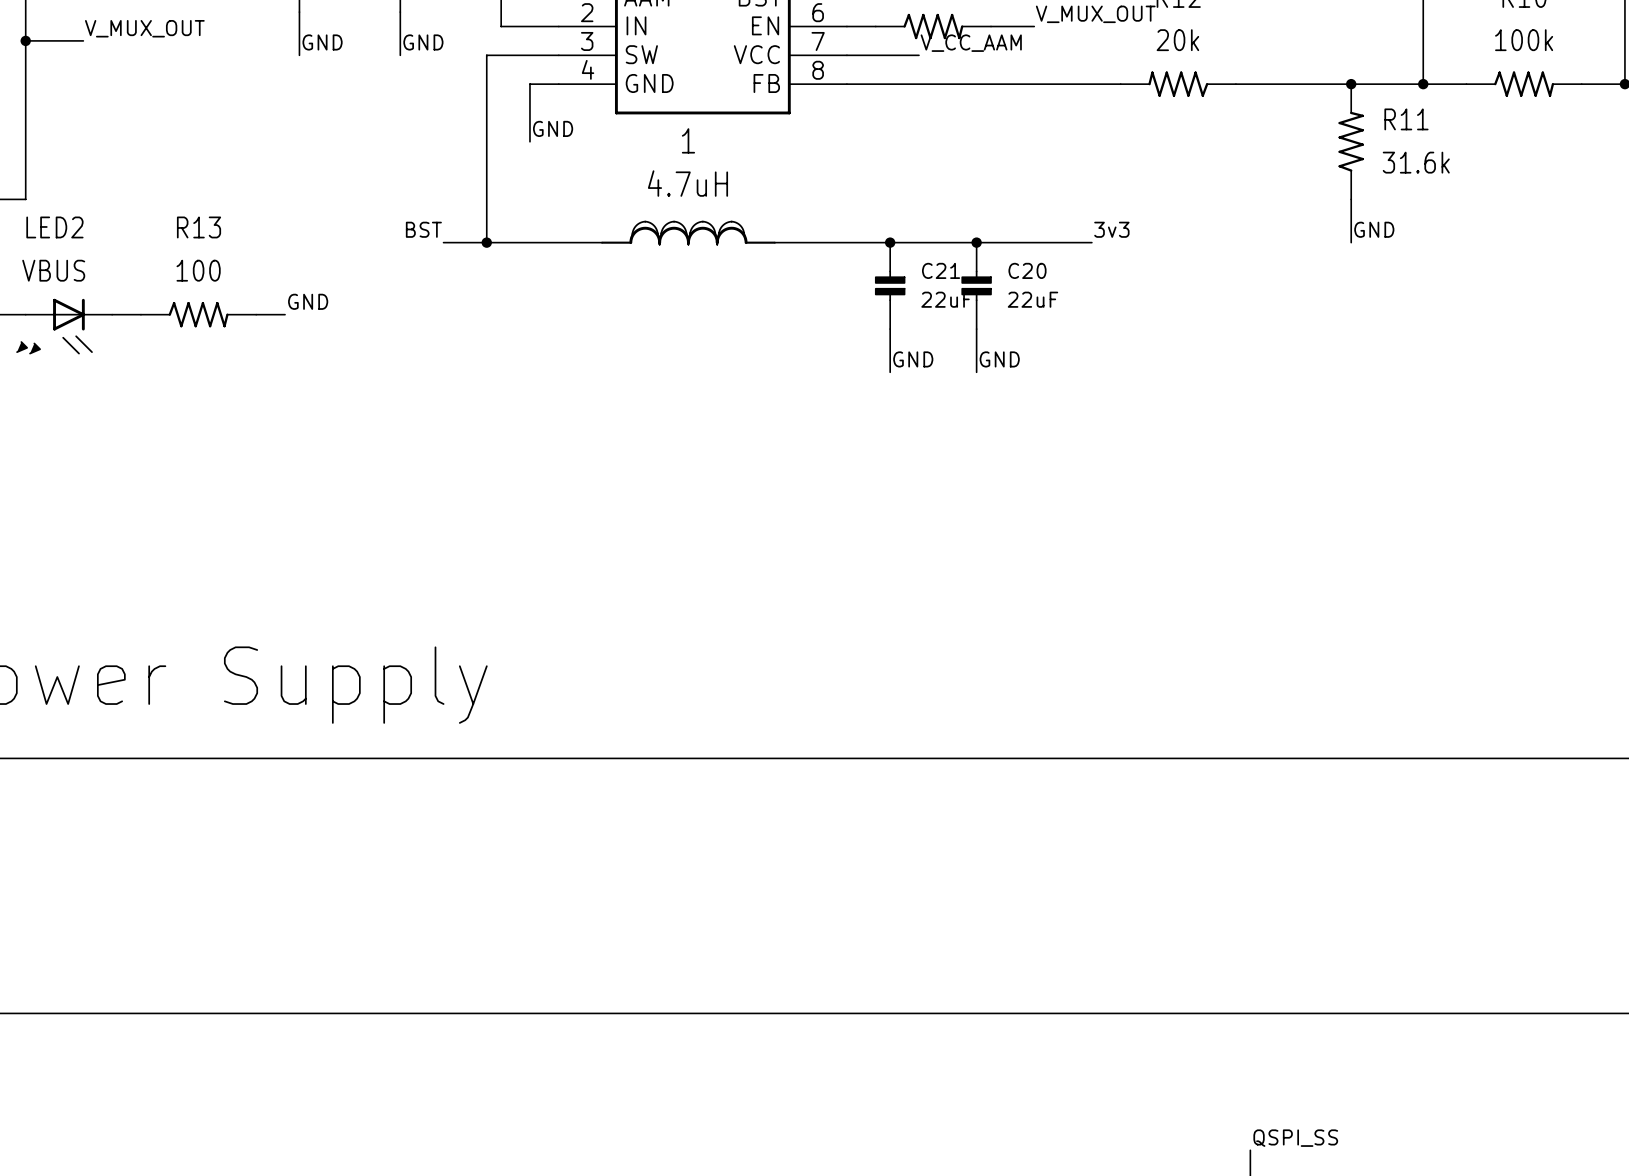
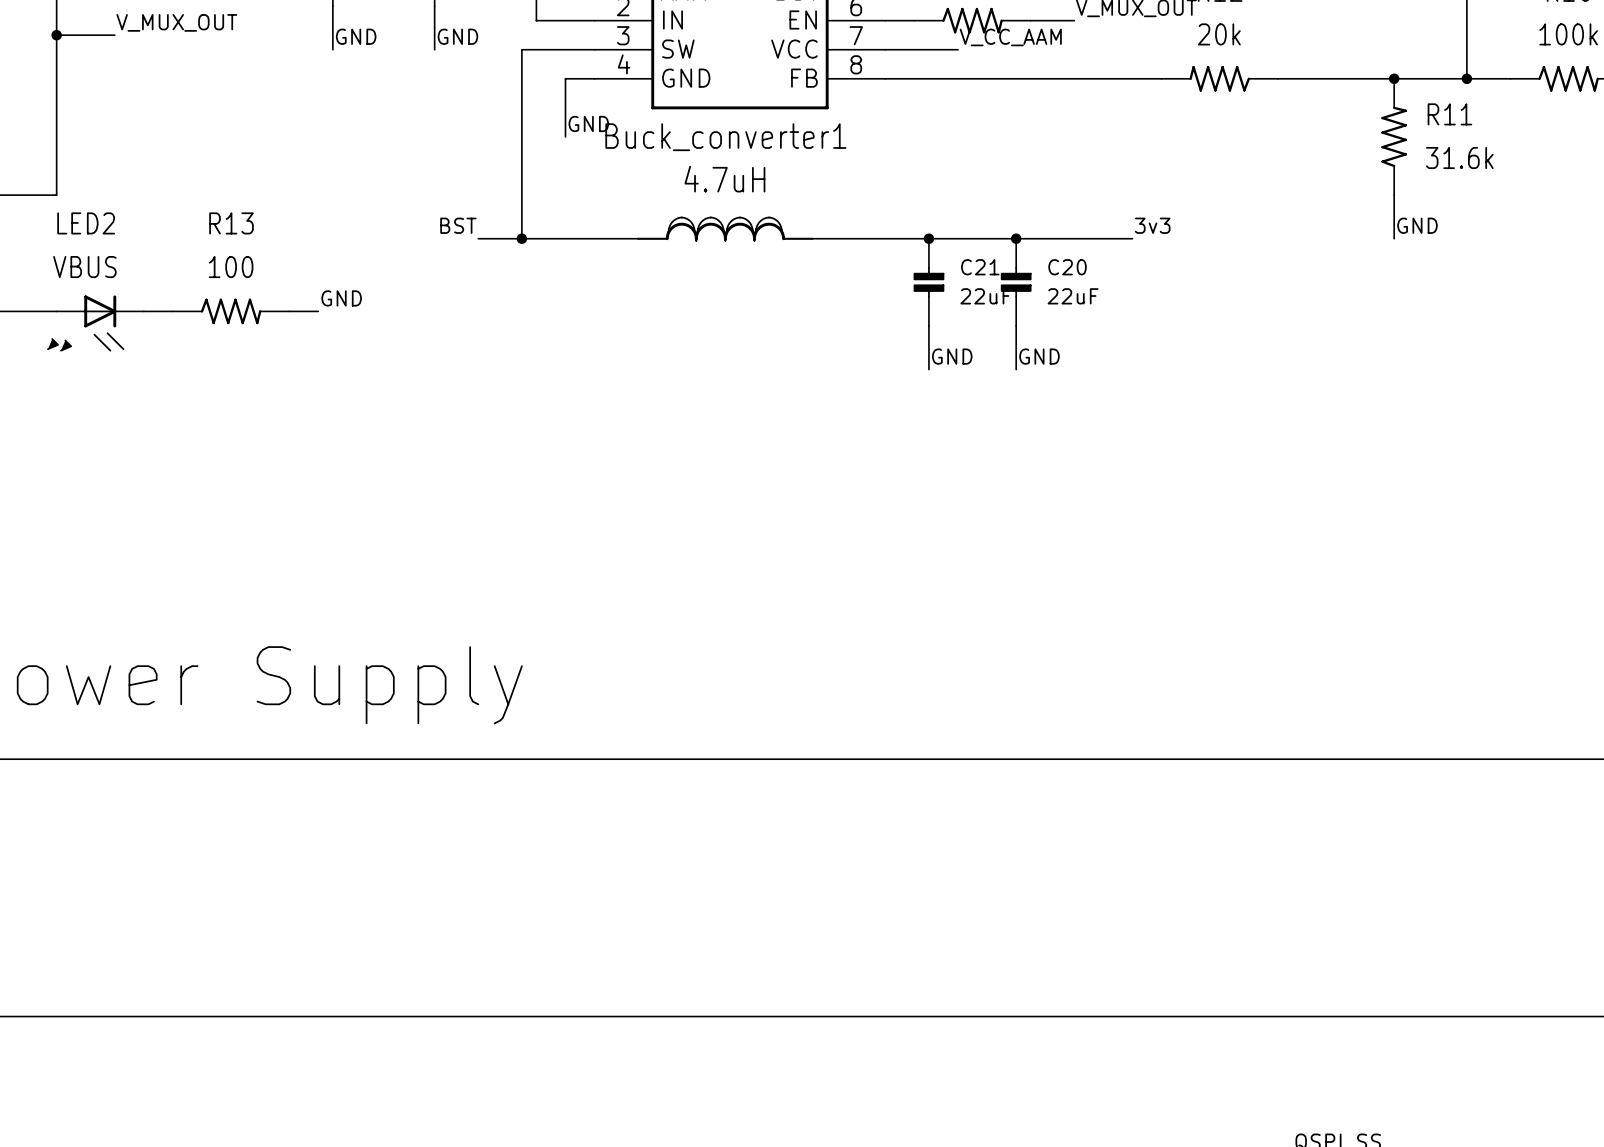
1 name: 1 (688, 140) -> Buck_converter1 (725, 137)

